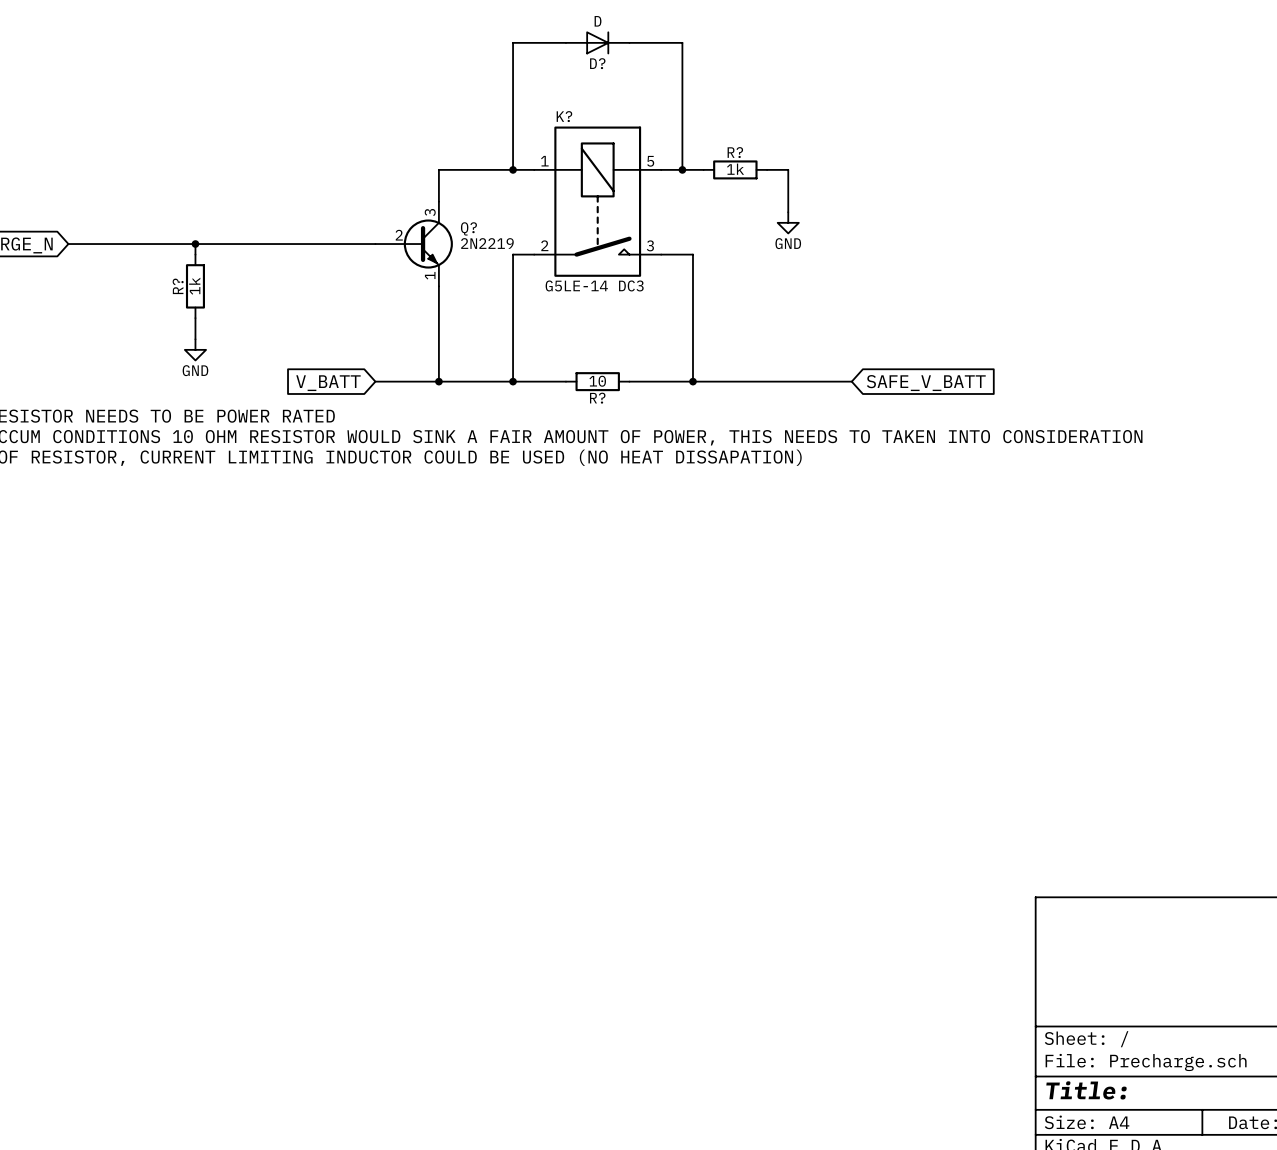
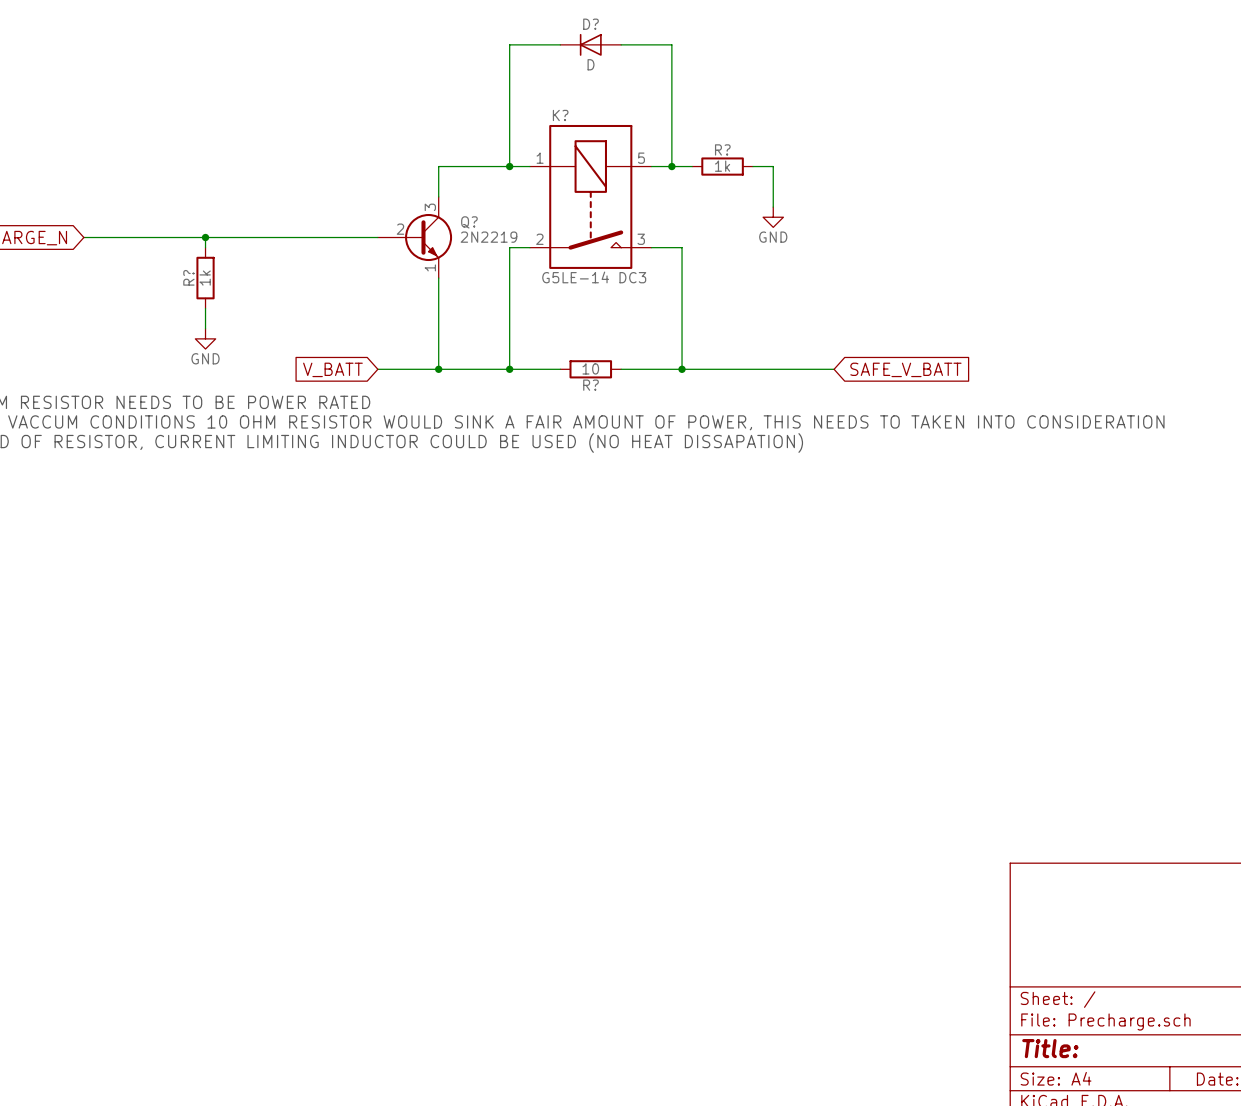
D? rotation: 0° (597, 42) -> 180° (590, 44)

